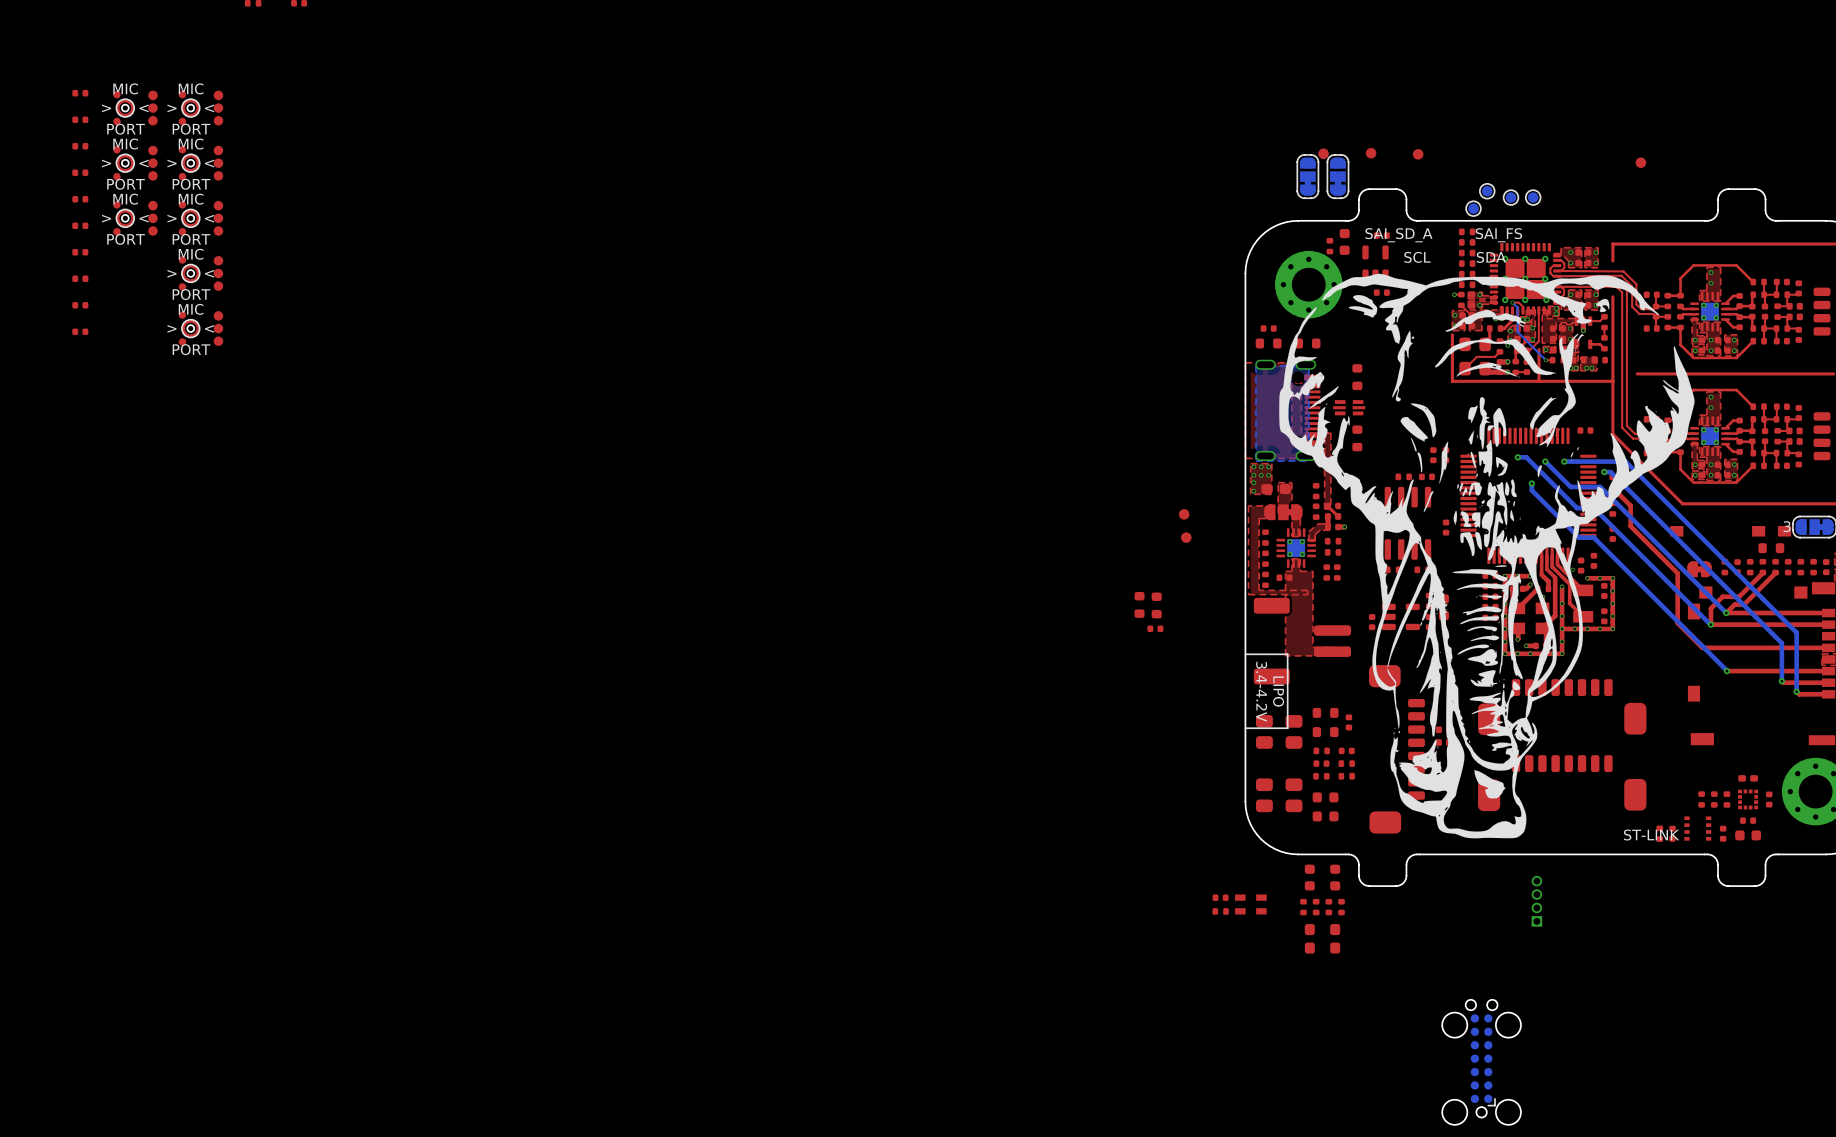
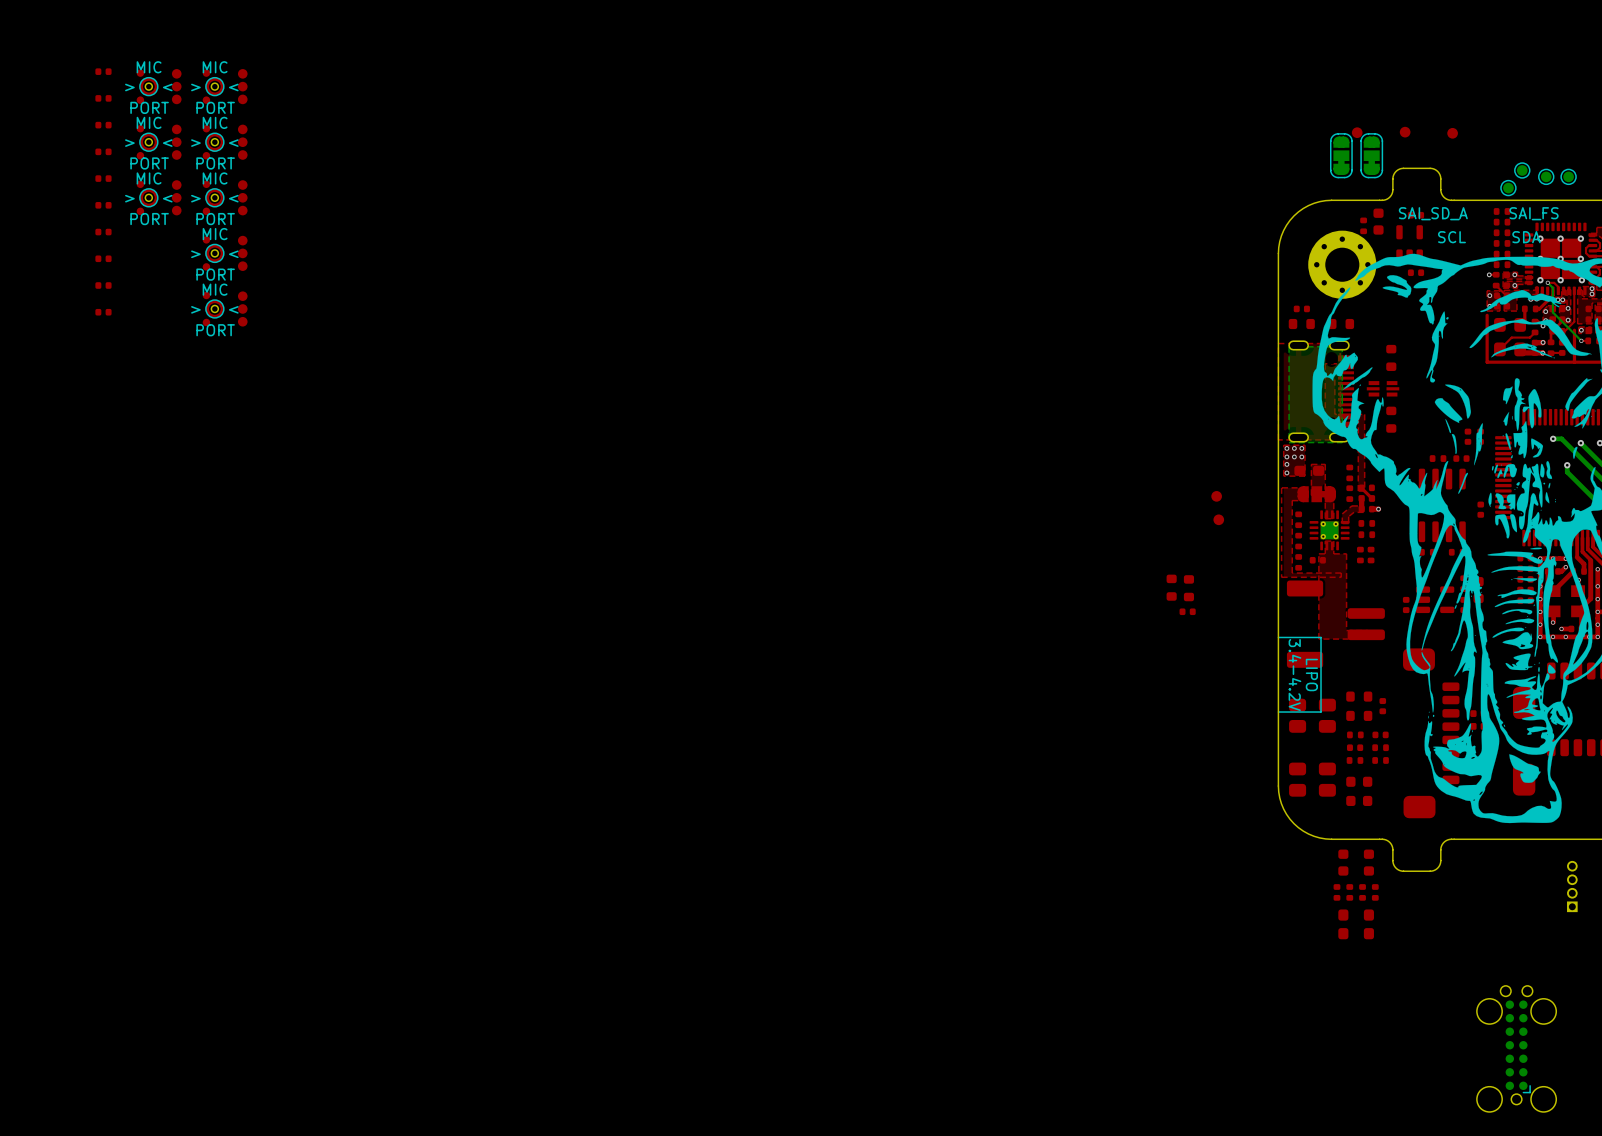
part: (1220, 897) -> none
part: (1250, 904) -> none
part: (1220, 911) -> none

